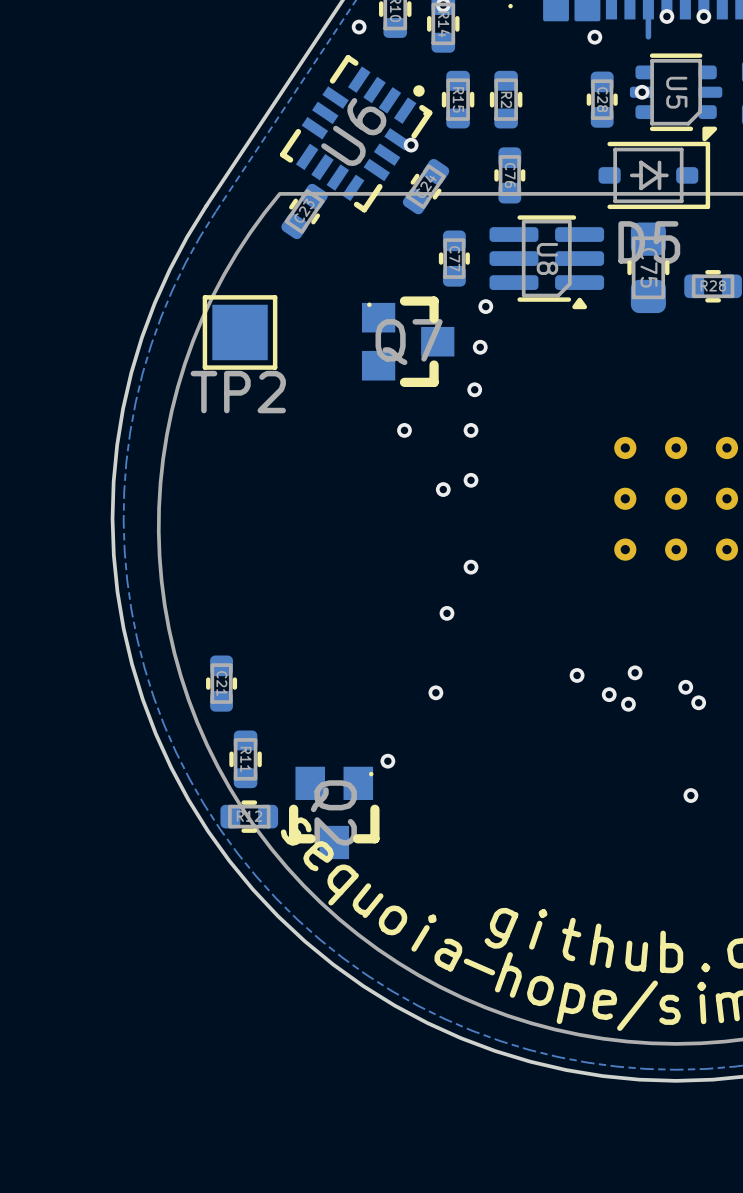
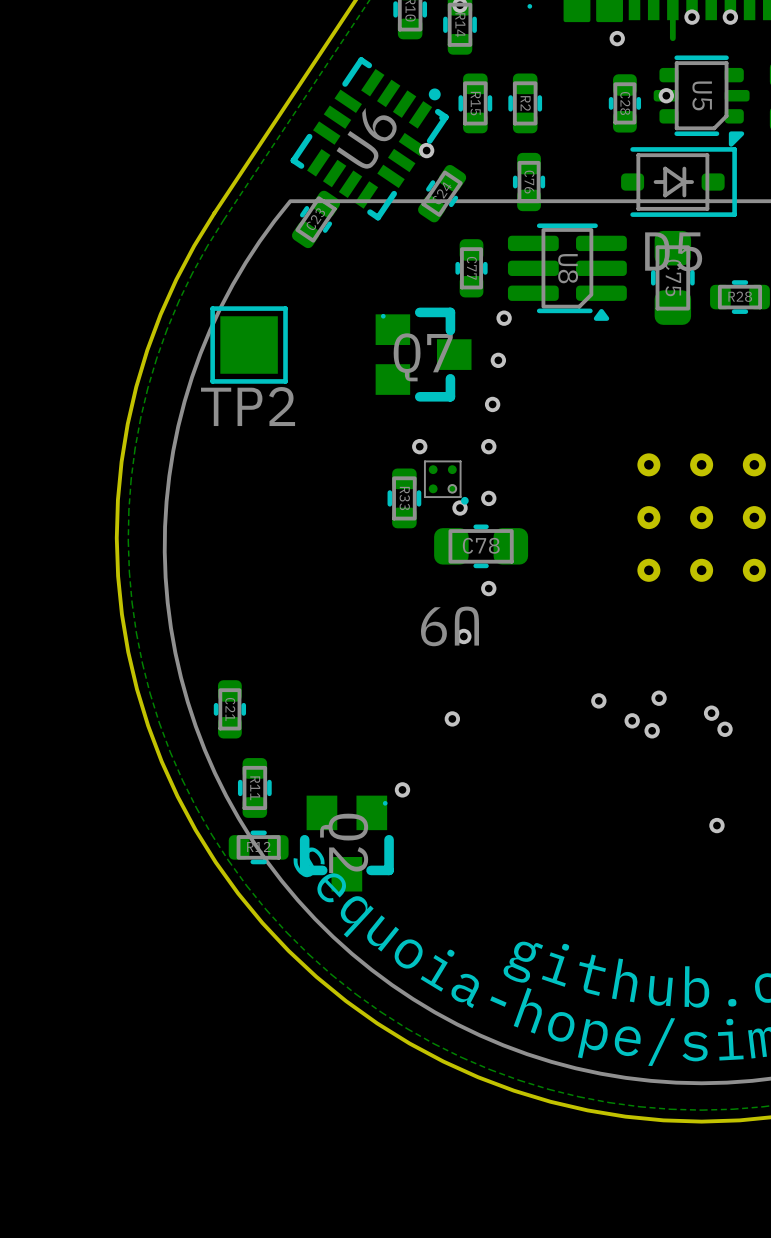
via: (359, 27) -> none
U9: none -> (446, 482)
R33: none -> (404, 498)
C78: none -> (481, 546)

